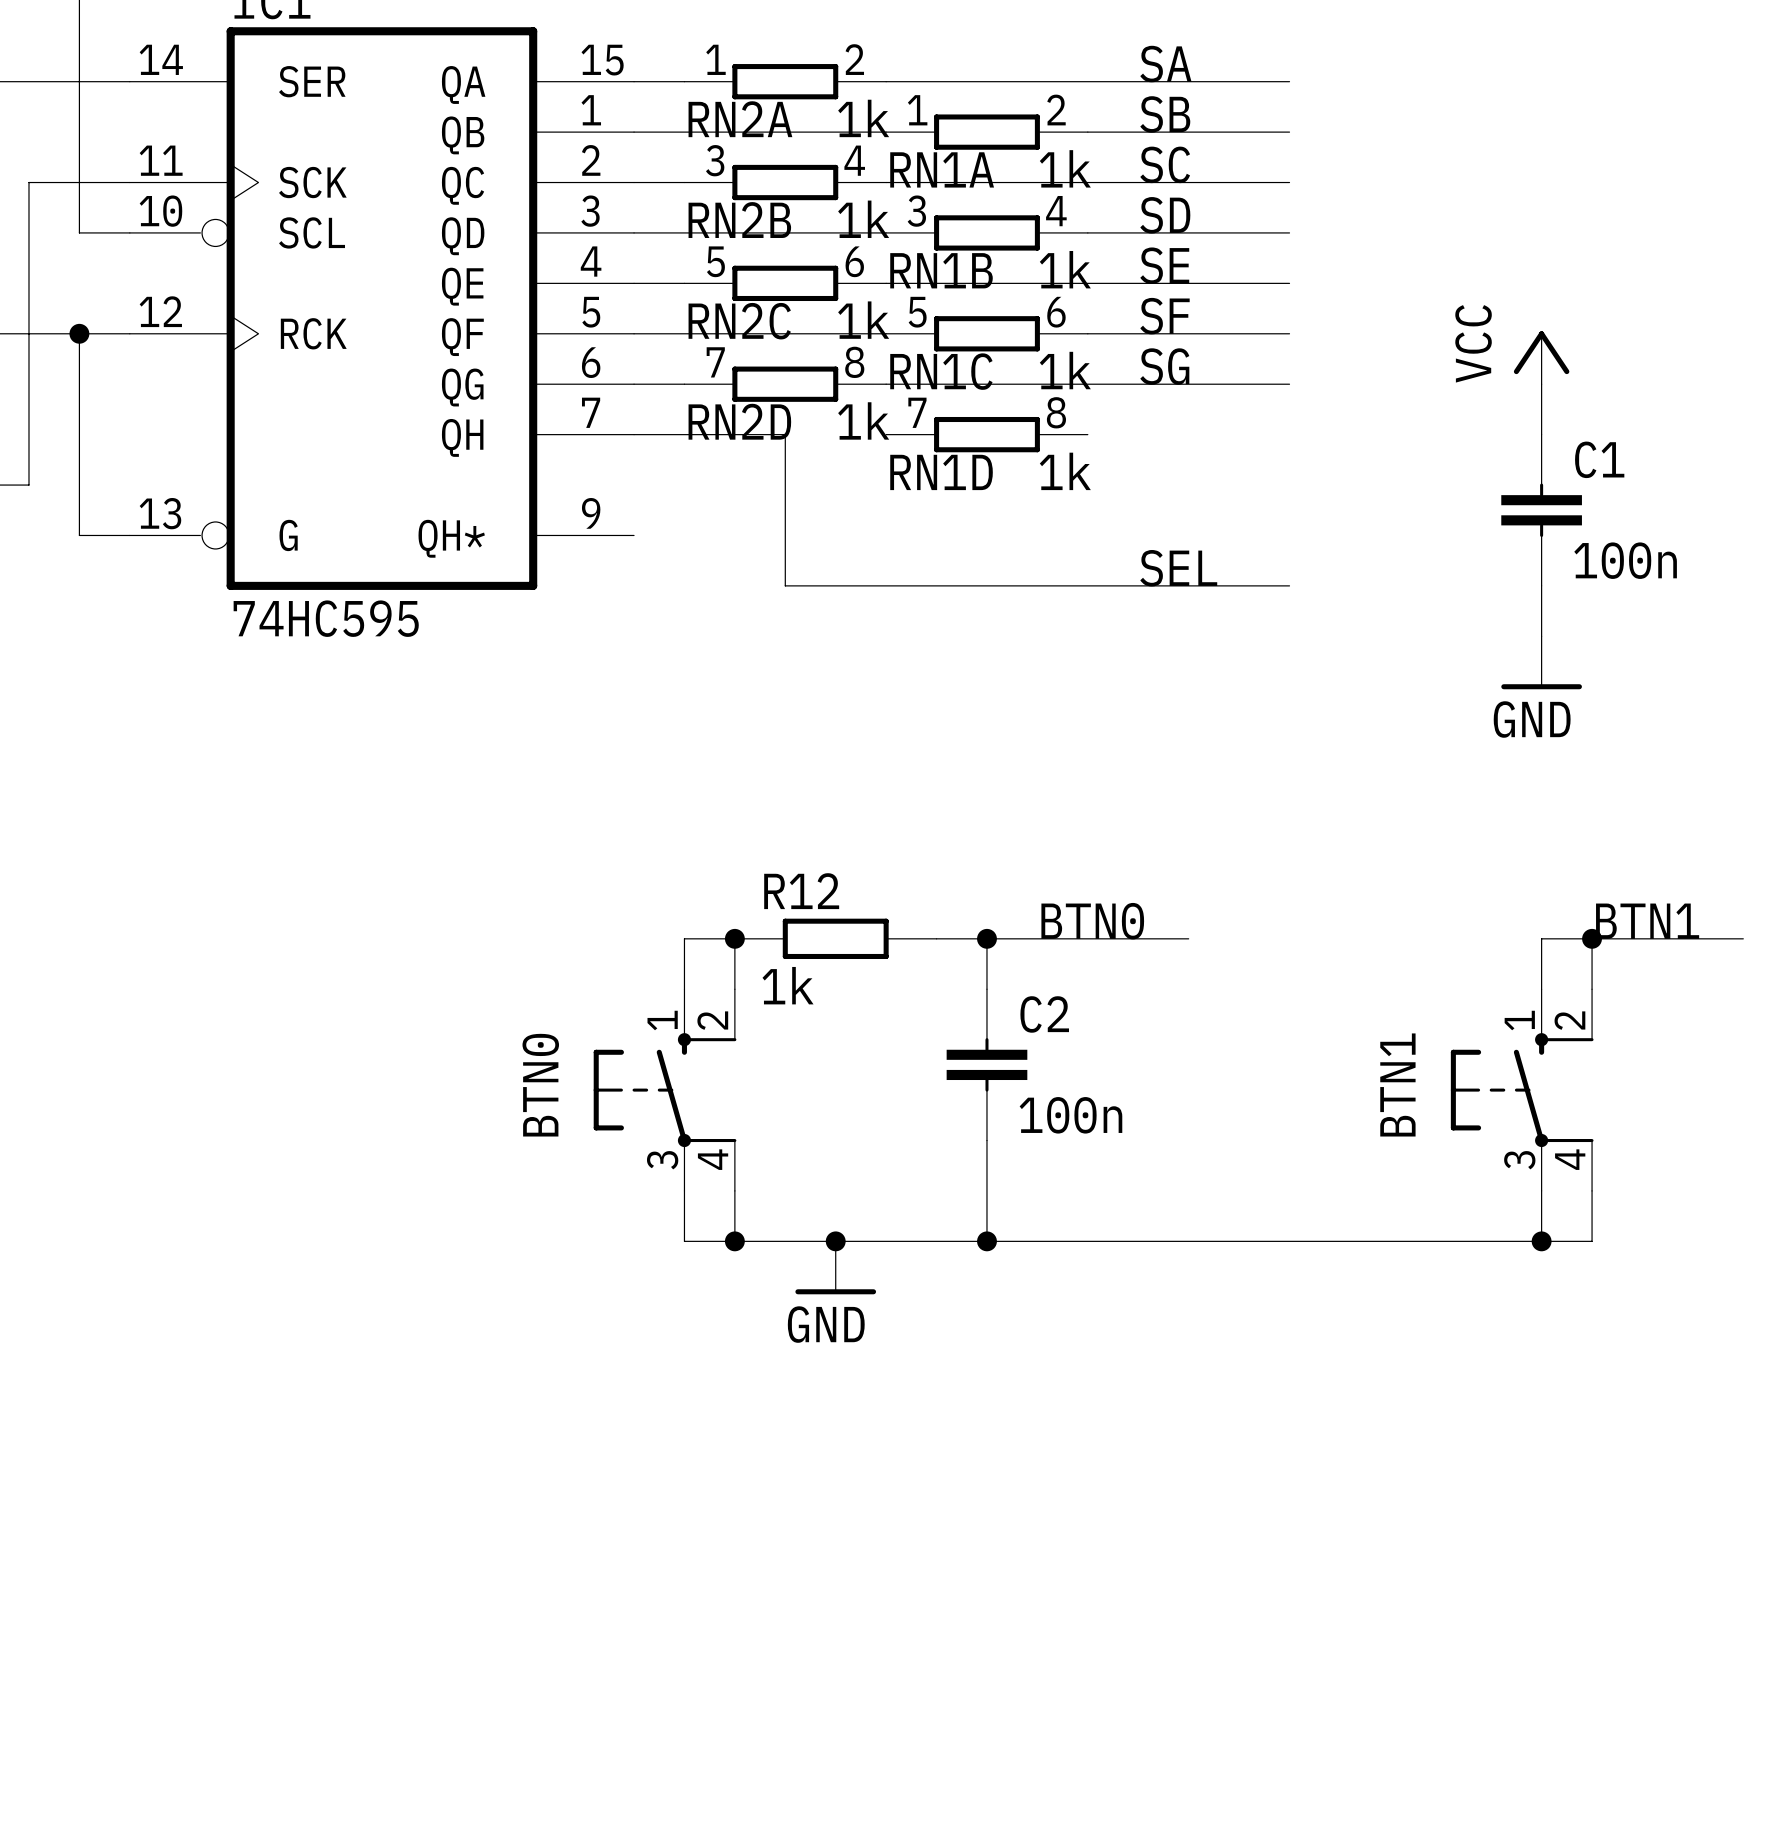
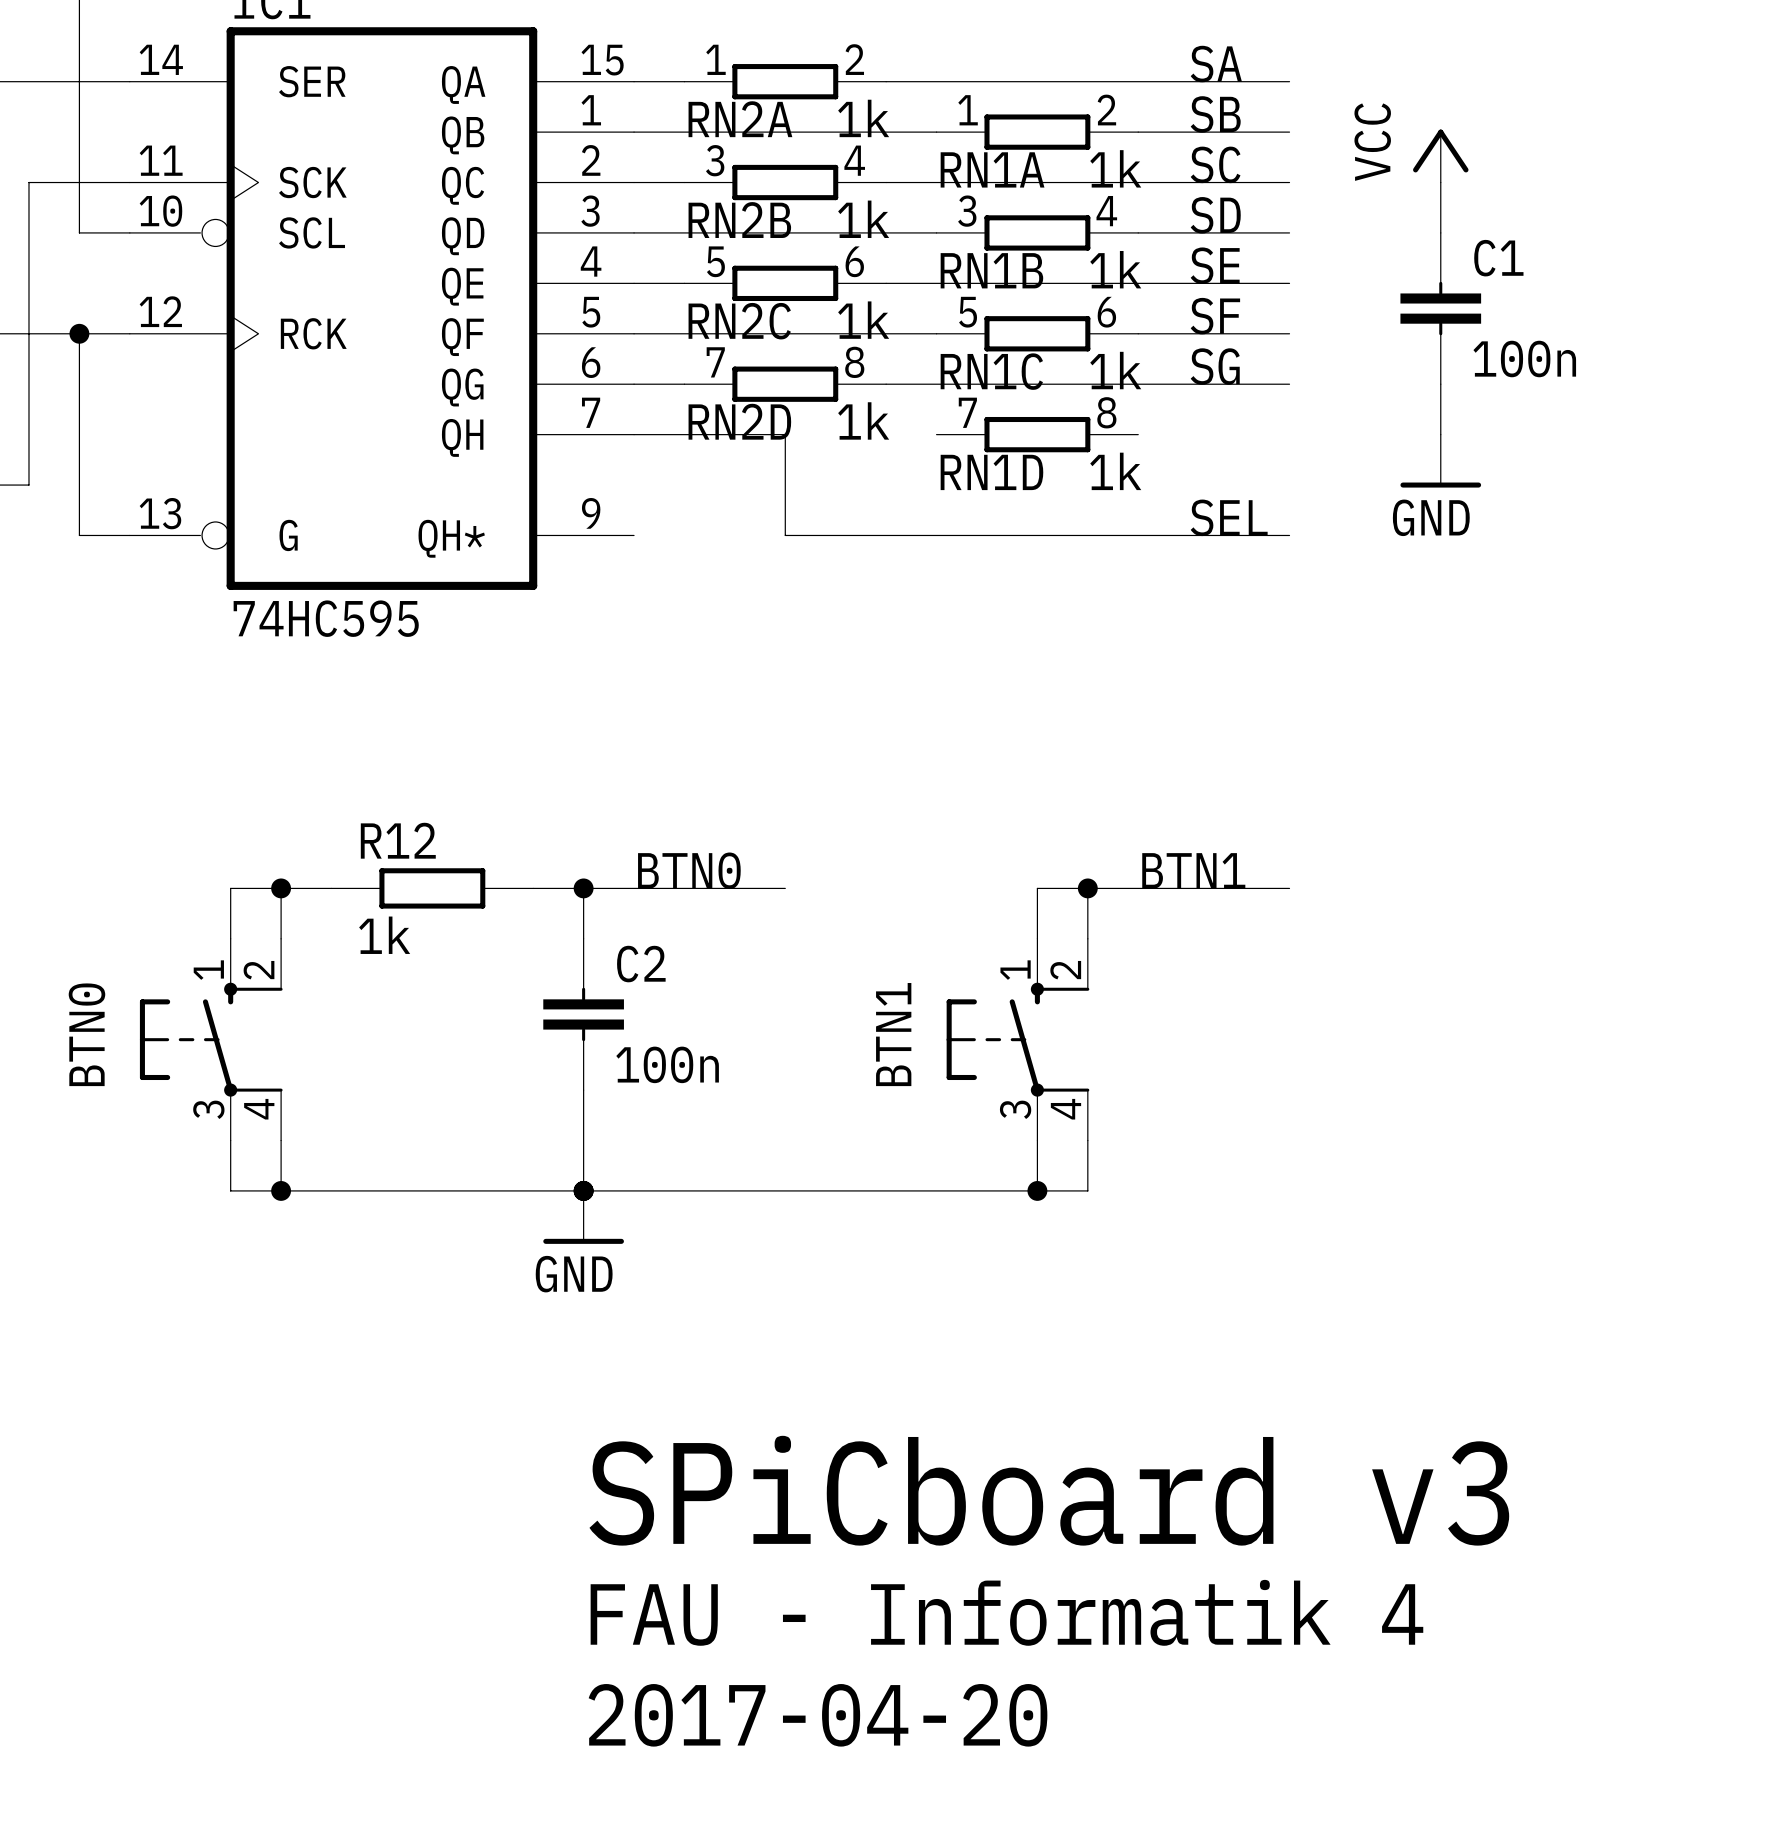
label position: SA (1165, 64) -> SA (1216, 64)
label position: SB (1165, 114) -> SB (1215, 114)
RN1A position: (986, 132) -> (1037, 132)
label position: SC (1165, 164) -> SC (1215, 164)
label position: SD (1165, 215) -> SD (1215, 215)
RN1B position: (986, 232) -> (1037, 232)
label position: SE (1164, 265) -> SE (1215, 265)
label position: SF (1164, 316) -> SF (1215, 316)
RN1C position: (986, 333) -> (1037, 333)
power symbol position: VCC (1541, 357) -> VCC (1440, 156)
label position: SG (1164, 366) -> SG (1215, 366)
wire: (1541, 384) (1541, 434) -> (1440, 182) (1440, 232)
RN1D position: (986, 434) -> (1037, 434)
C1 position: (1541, 510) -> (1440, 308)
wire: (785, 535) (785, 585) (1289, 585) -> (785, 535) (1289, 535)
label position: SEL (1178, 568) -> SEL (1229, 517)
wire: (1541, 585) (1541, 636) -> (1440, 384) (1440, 434)
power symbol position: GND (1541, 662) -> GND (1440, 461)
wire: none -> (281, 888) (281, 938)
junction: none -> (281, 888)
wire: none -> (331, 888) (230, 888) (230, 938)
junction: none -> (583, 888)
wire: none -> (1087, 888) (1087, 938)
wire: none -> (1289, 888) (1037, 888) (1037, 938)
label position: BTN0 (1092, 921) -> BTN0 (689, 870)
label position: BTN1 (1647, 921) -> BTN1 (1193, 870)
junction: (734, 938) -> none
R12 position: (835, 938) -> (432, 888)
wire: (936, 938) (1188, 938) -> (533, 888) (785, 888)
wire: (986, 938) (986, 989) -> (583, 888) (583, 938)
junction position: (986, 938) -> (1087, 888)
wire: (1592, 938) (1592, 989) -> none
junction: (1592, 938) -> none
wire: (1743, 938) (1541, 938) (1541, 989) -> none
wire: (684, 989) (684, 938) (734, 938) (734, 989) -> none
C2 position: (986, 1064) -> (583, 1014)
BTN0 position: (665, 1090) -> (211, 1039)
BTN1 position: (1522, 1090) -> (1017, 1039)
wire: none -> (230, 1140) (230, 1190) (1087, 1190) (1087, 1140)
wire: none -> (281, 1140) (281, 1190)
wire: (986, 1140) (986, 1241) -> (583, 1090) (583, 1190)
junction: none -> (281, 1190)
junction: none -> (583, 1190)
wire: (684, 1190) (684, 1241) (1592, 1241) (1592, 1190) -> none
wire: (734, 1190) (734, 1241) -> (1037, 1140) (1037, 1190)
wire: (1541, 1190) (1541, 1241) -> none
junction: (734, 1241) -> none
junction: (835, 1241) -> none
junction position: (986, 1241) -> (1037, 1190)
junction: (1541, 1241) -> none
power symbol position: GND (835, 1267) -> GND (583, 1217)
text: none -> SPiCboard v3 (1049, 1490)
text: none -> FAU - Informatik 4 (1006, 1612)
text: none -> 2017-04-20 (818, 1715)

